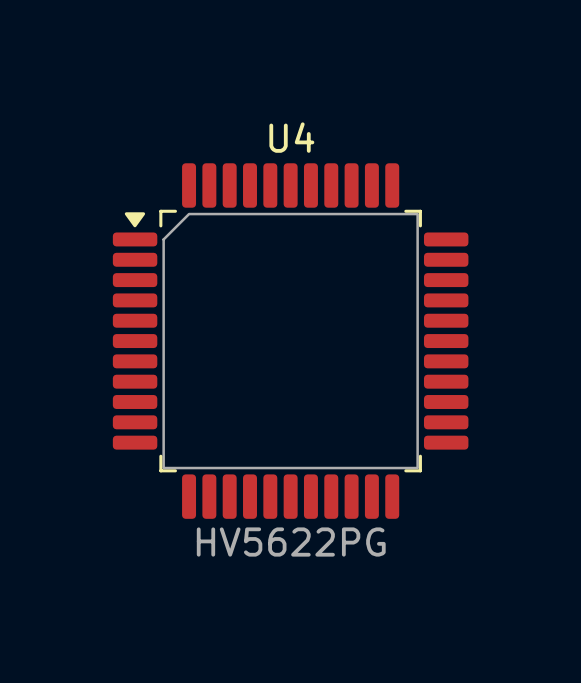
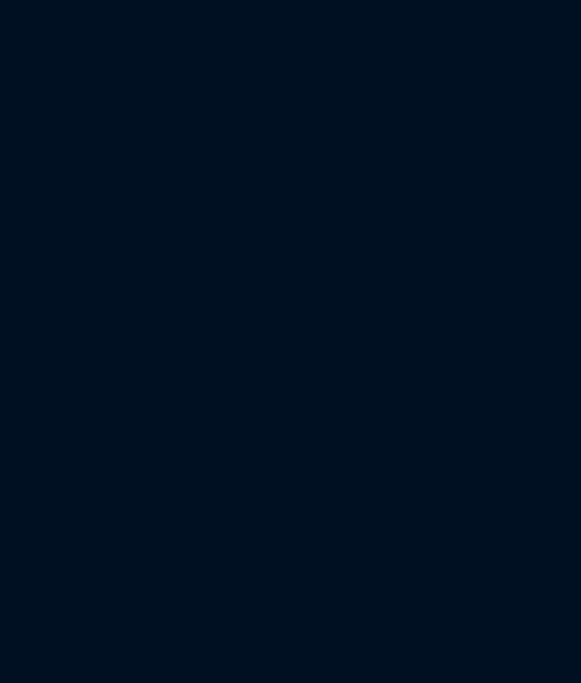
U4: HV5622PG (290, 341) -> none

